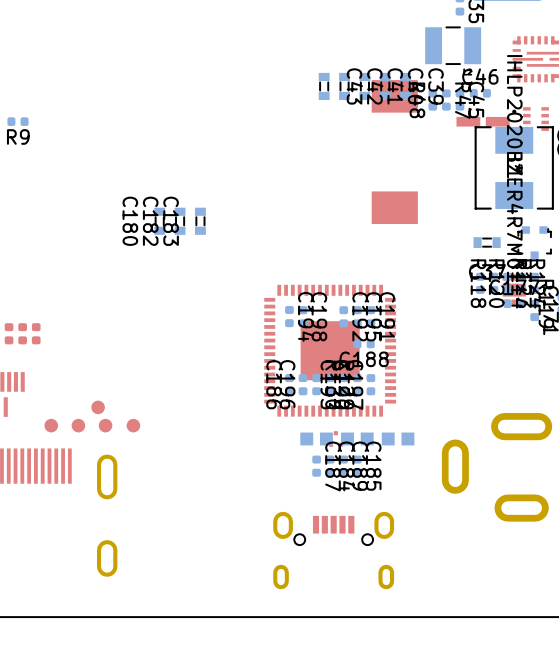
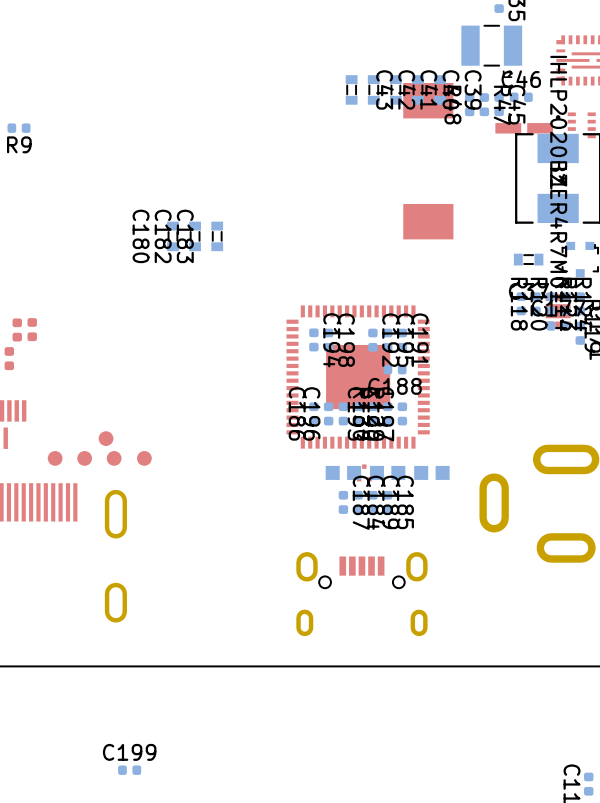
part: none -> (17, 329)
part: none -> (32, 329)
part: (22, 333) -> none
part: (36, 333) -> none

